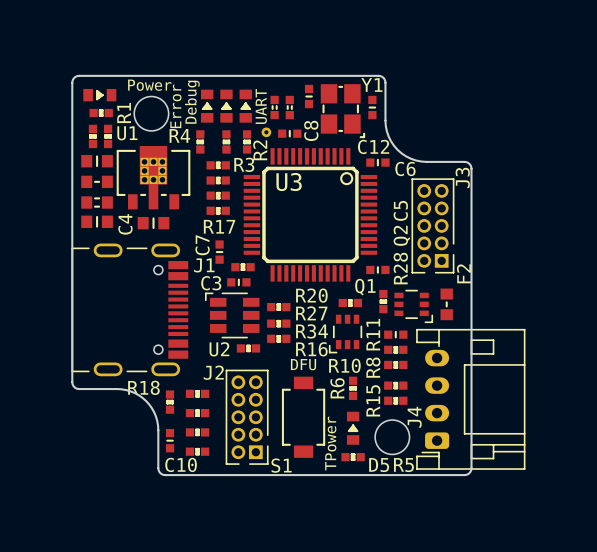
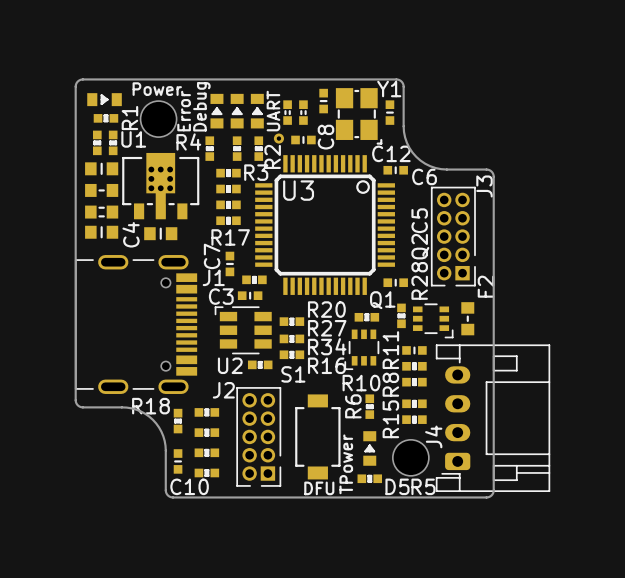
S1 value position: DFU (303, 364) -> DFU (319, 488)
S1 name position: S1 (281, 465) -> S1 (293, 374)

